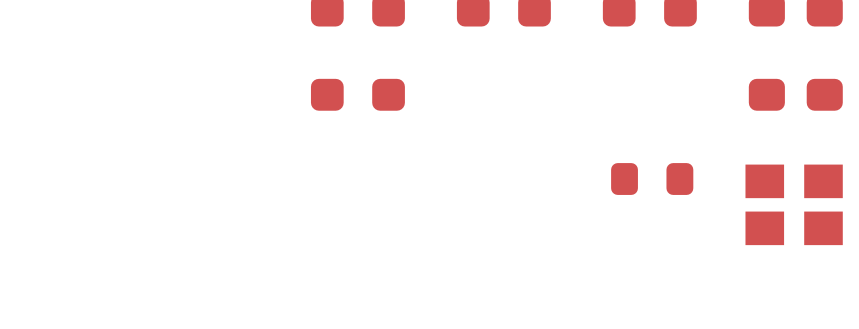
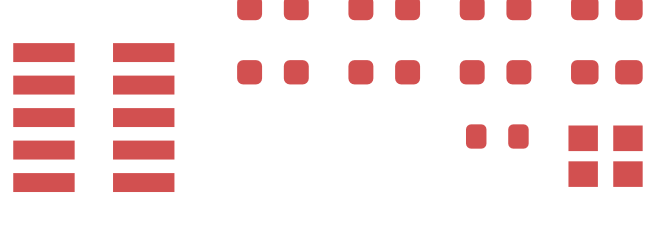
part: none -> (384, 72)
part: none -> (495, 72)
part: none -> (93, 117)

